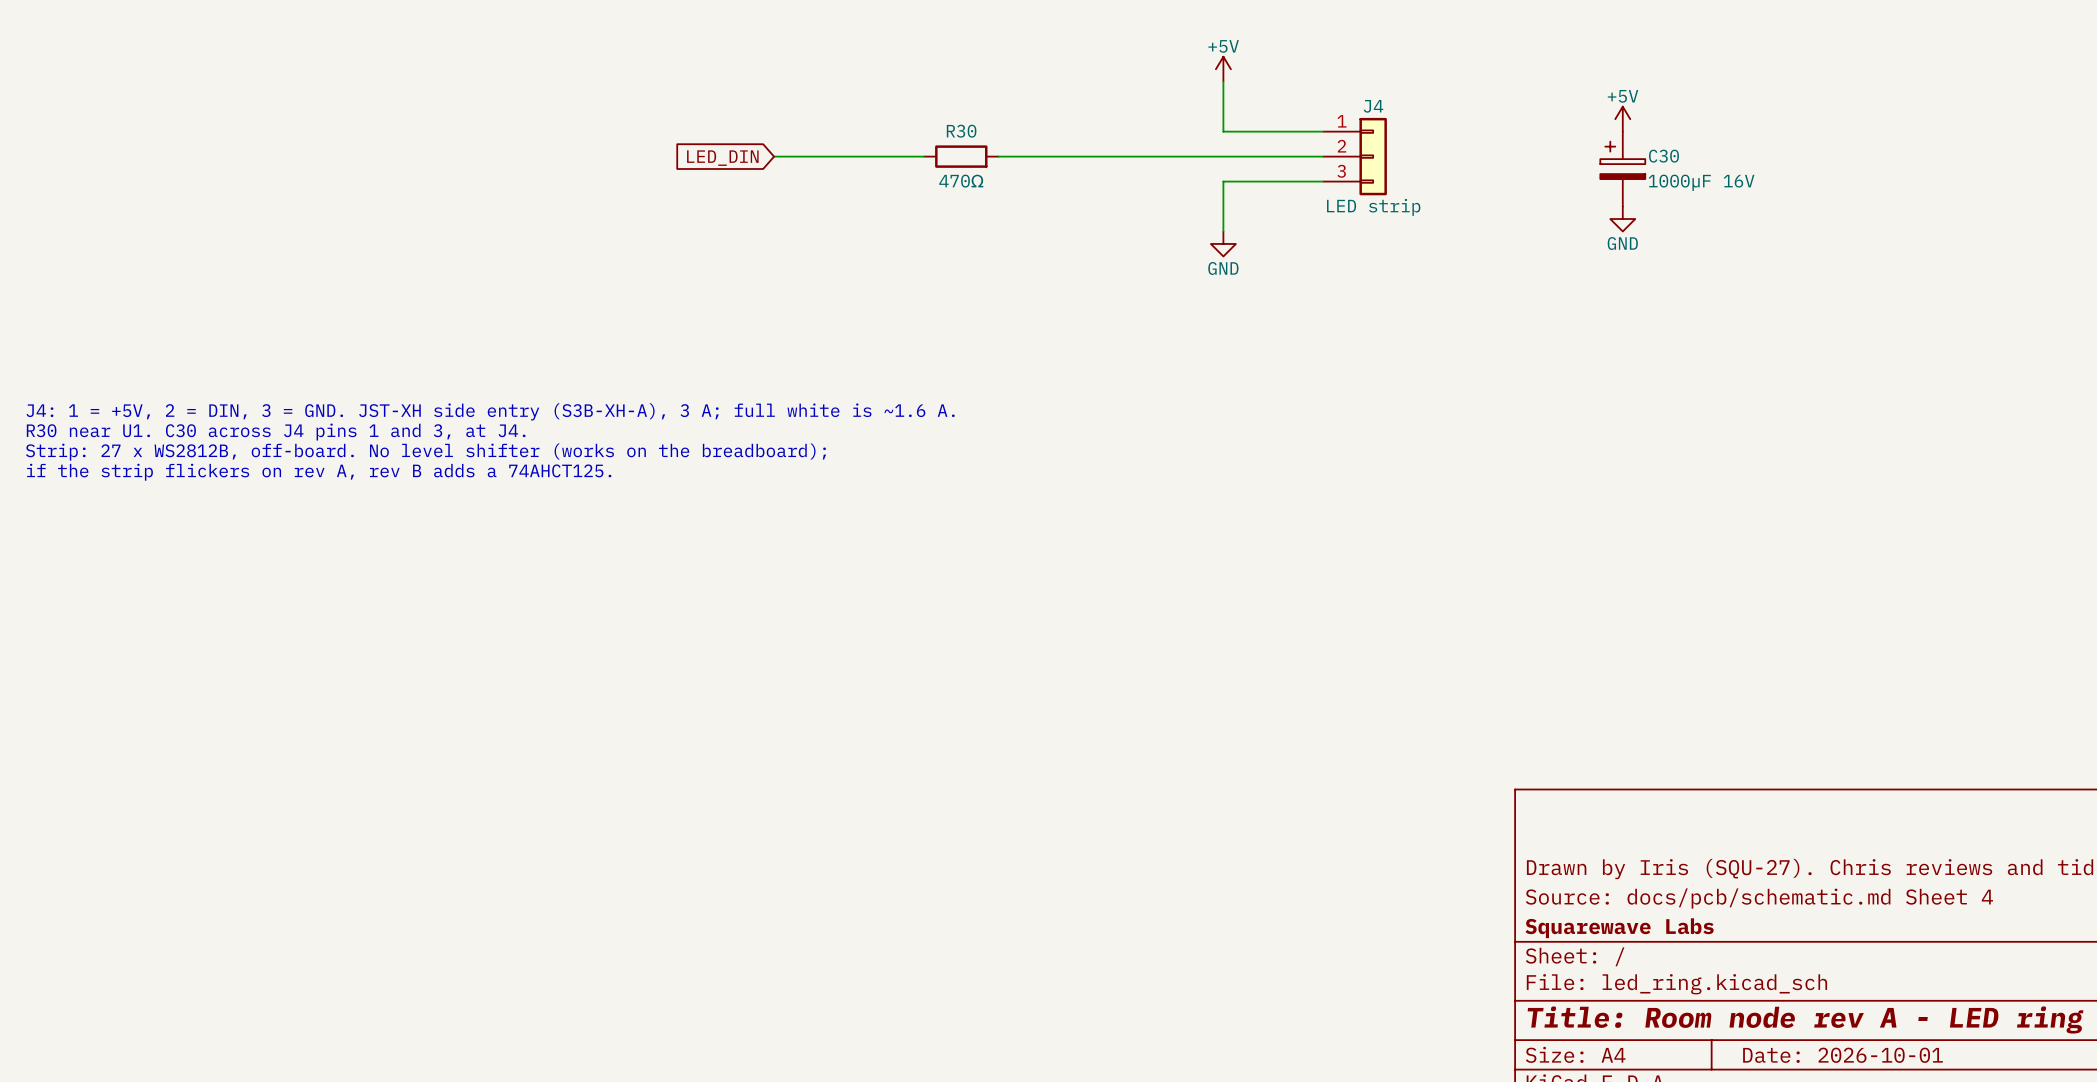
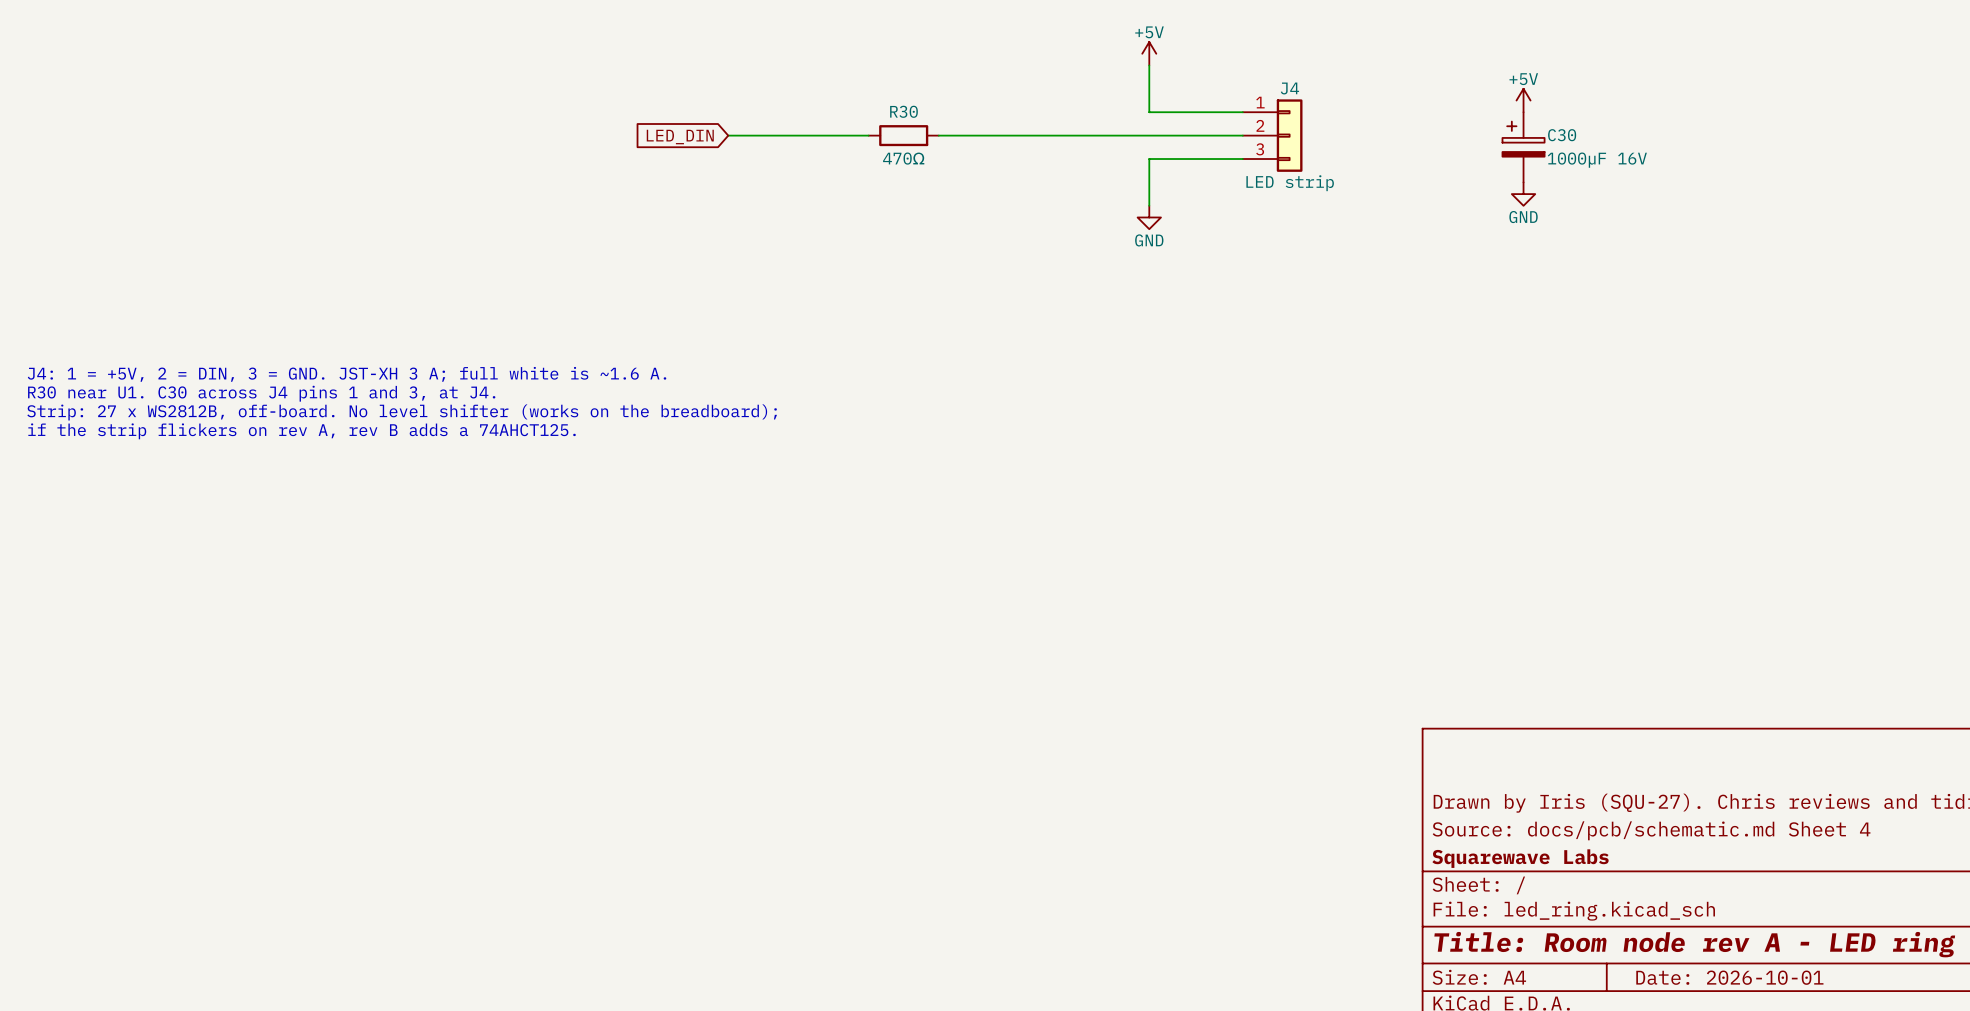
text: J4: 1 = +5V, 2 = DIN, 3 = GND. JST-XH side entry (S3B-XH-A), 3 A; full white is ~1.6 A. (490, 411) -> J4: 1 = +5V, 2 = DIN, 3 = GND. JST-XH 3 A; full white is ~1.6 A. (347, 374)

